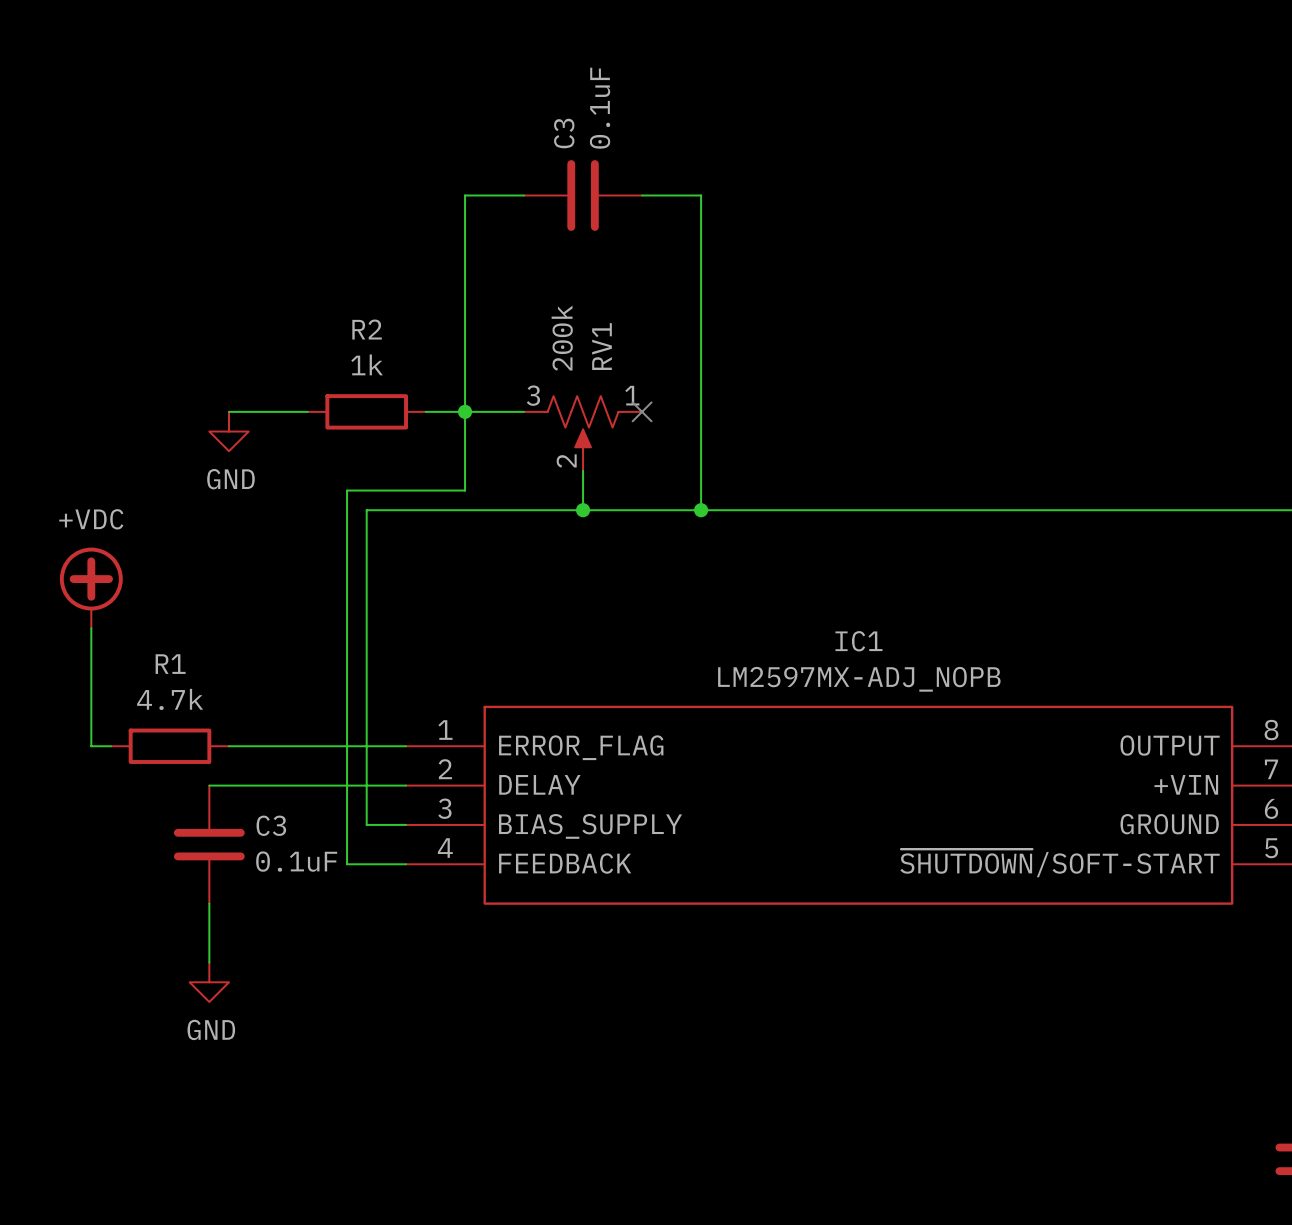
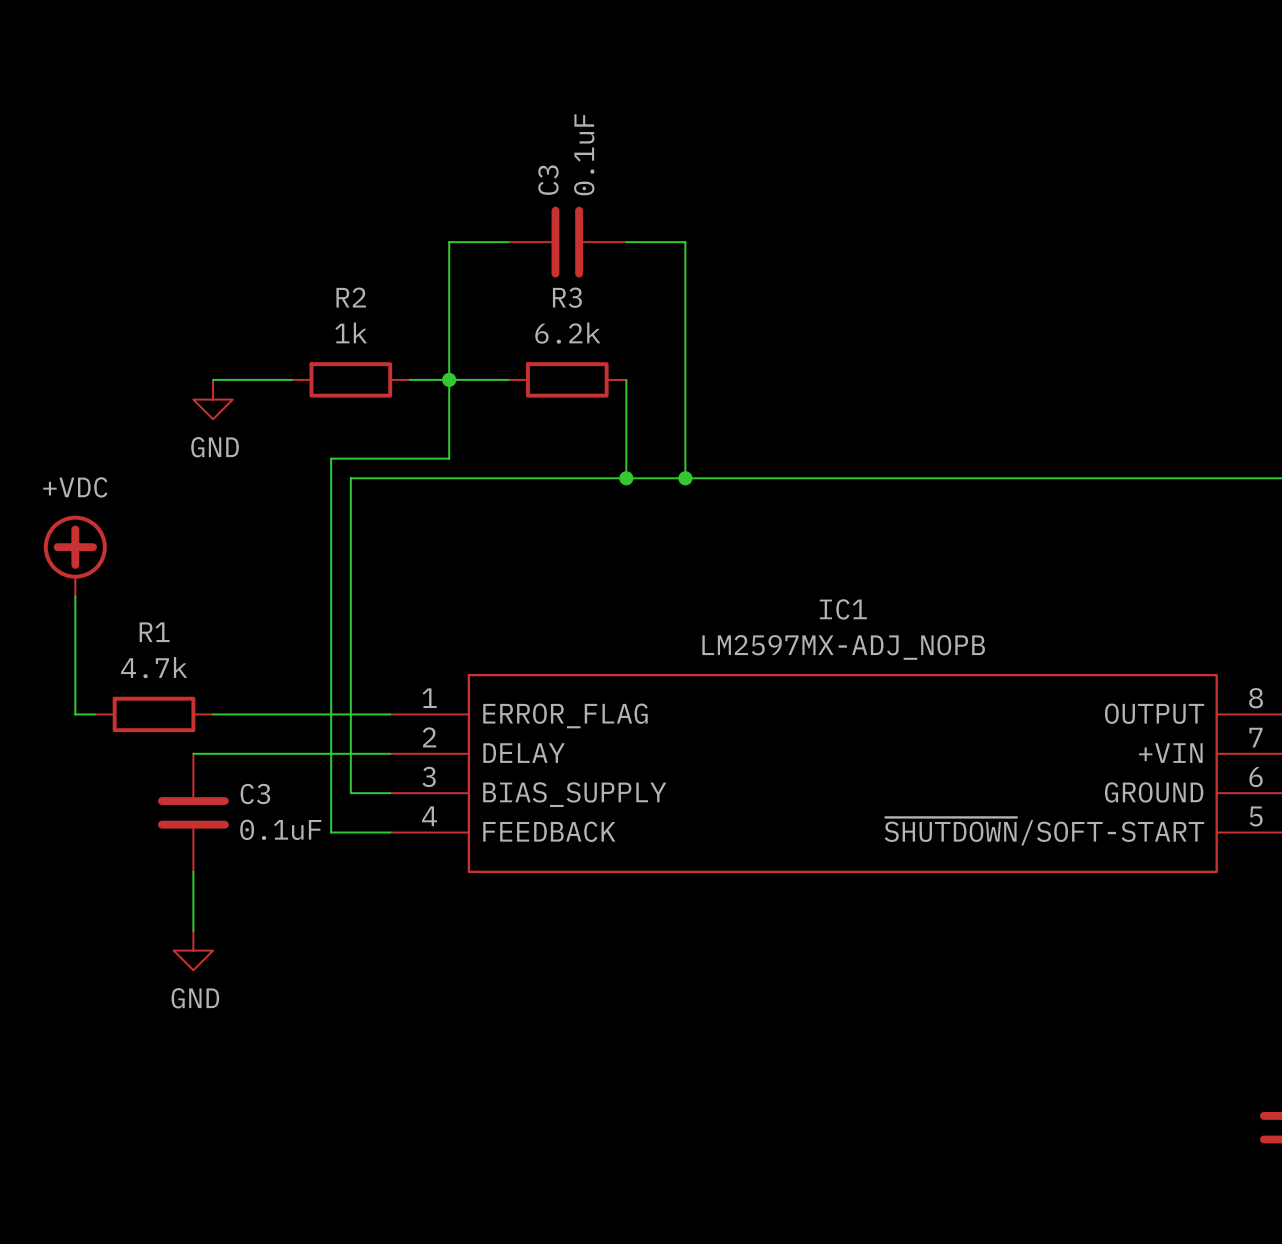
wire: (524, 195) (465, 195) (465, 274) -> (508, 242) (449, 242)
C3 position: (583, 195) -> (567, 242)
wire: (642, 195) (701, 195) (701, 274) -> (626, 242) (685, 242)
R3: none -> 6.2k (567, 379)
wire: none -> (626, 379) (626, 478)
no-connect mark: (642, 411) -> none
RV1: 200k (583, 433) -> none
wire: (583, 470) (583, 510) -> none
junction position: (583, 510) -> (626, 478)

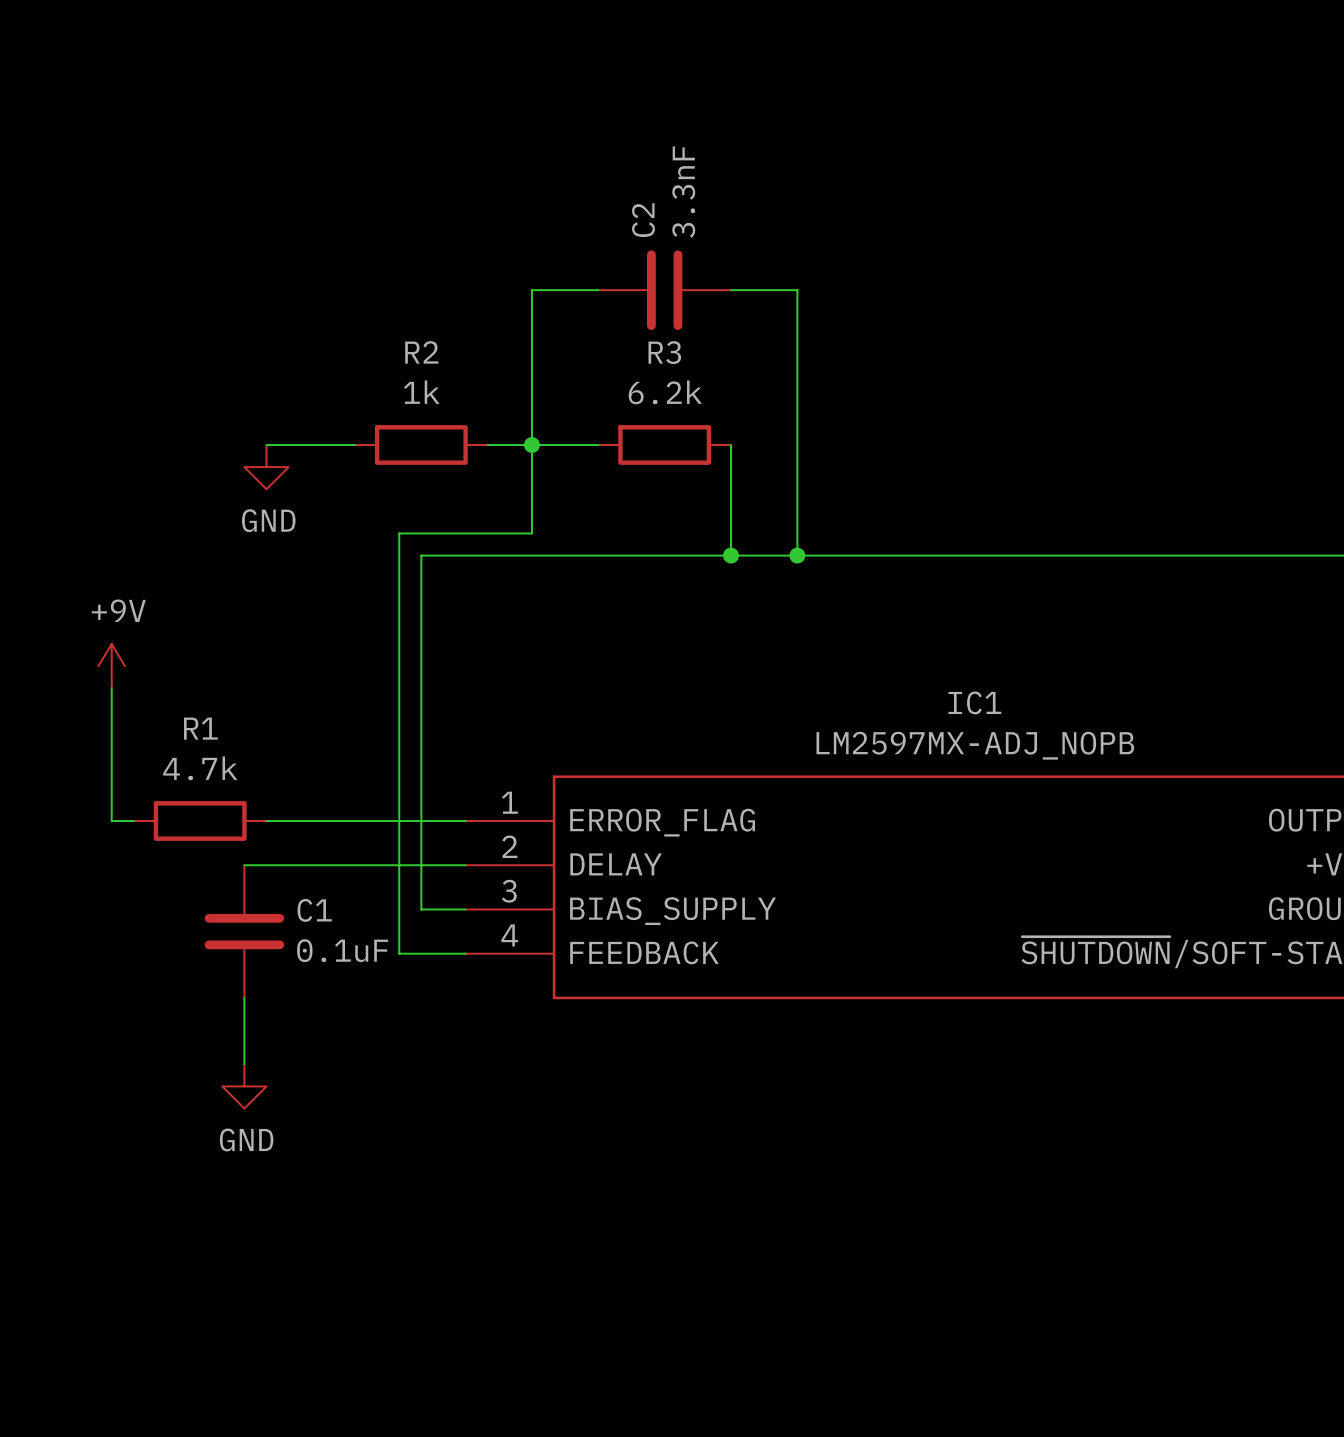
C3 value: 0.1uF (584, 154) -> 3.3nF (683, 192)
C3 name: C3 (548, 180) -> C2 (643, 220)
power symbol: +VDC (75, 556) -> none
power symbol: none -> +9V (111, 666)
C3 name: C3 (255, 794) -> C1 (314, 910)

